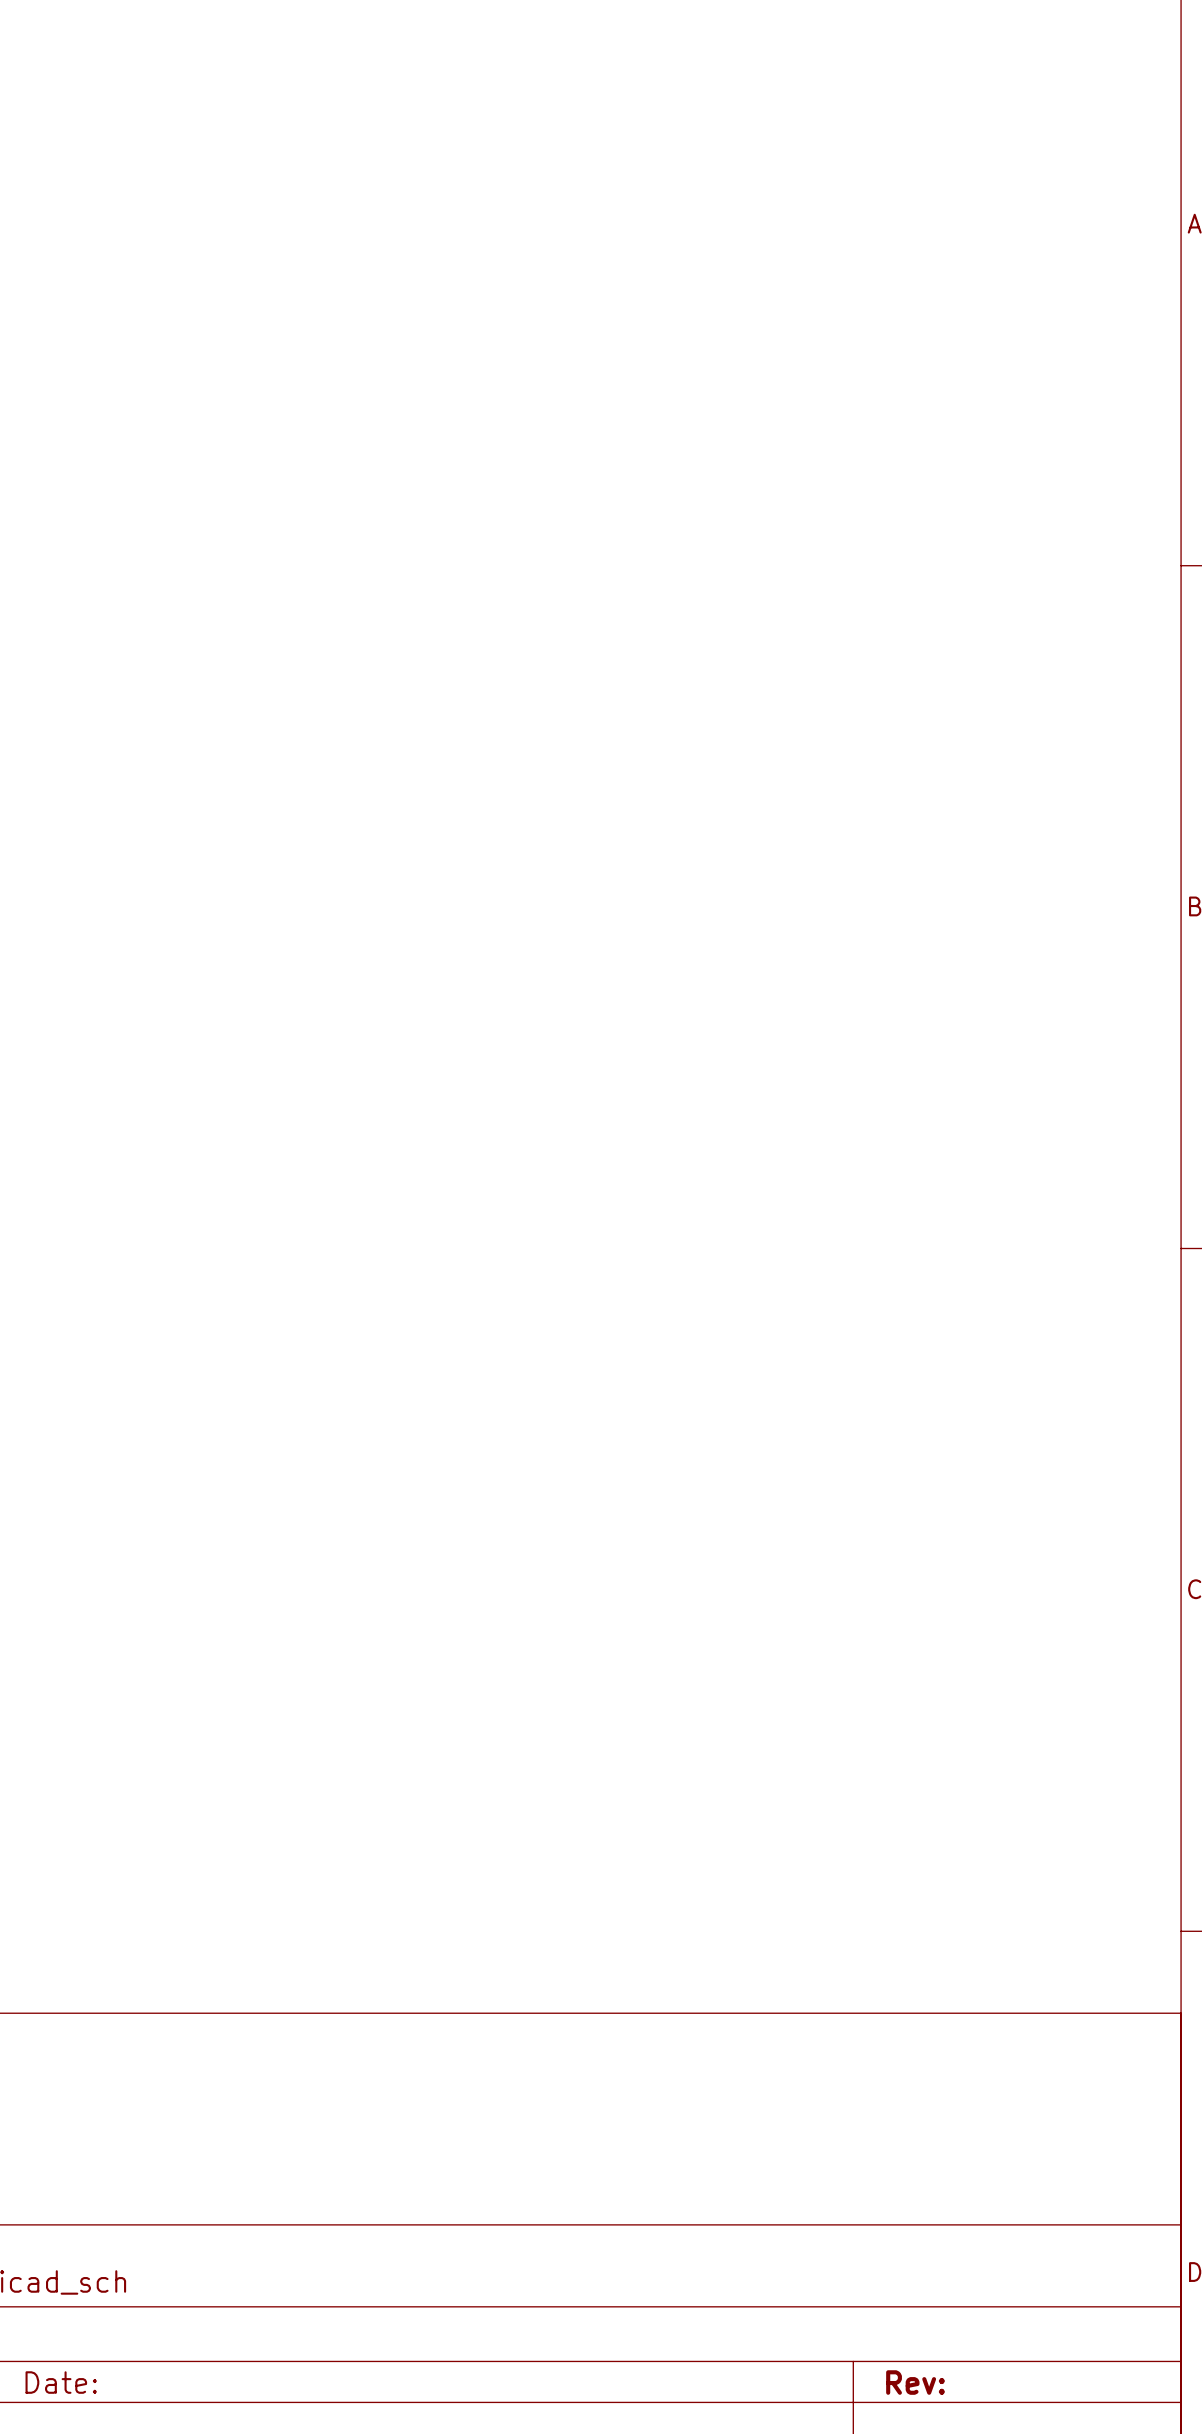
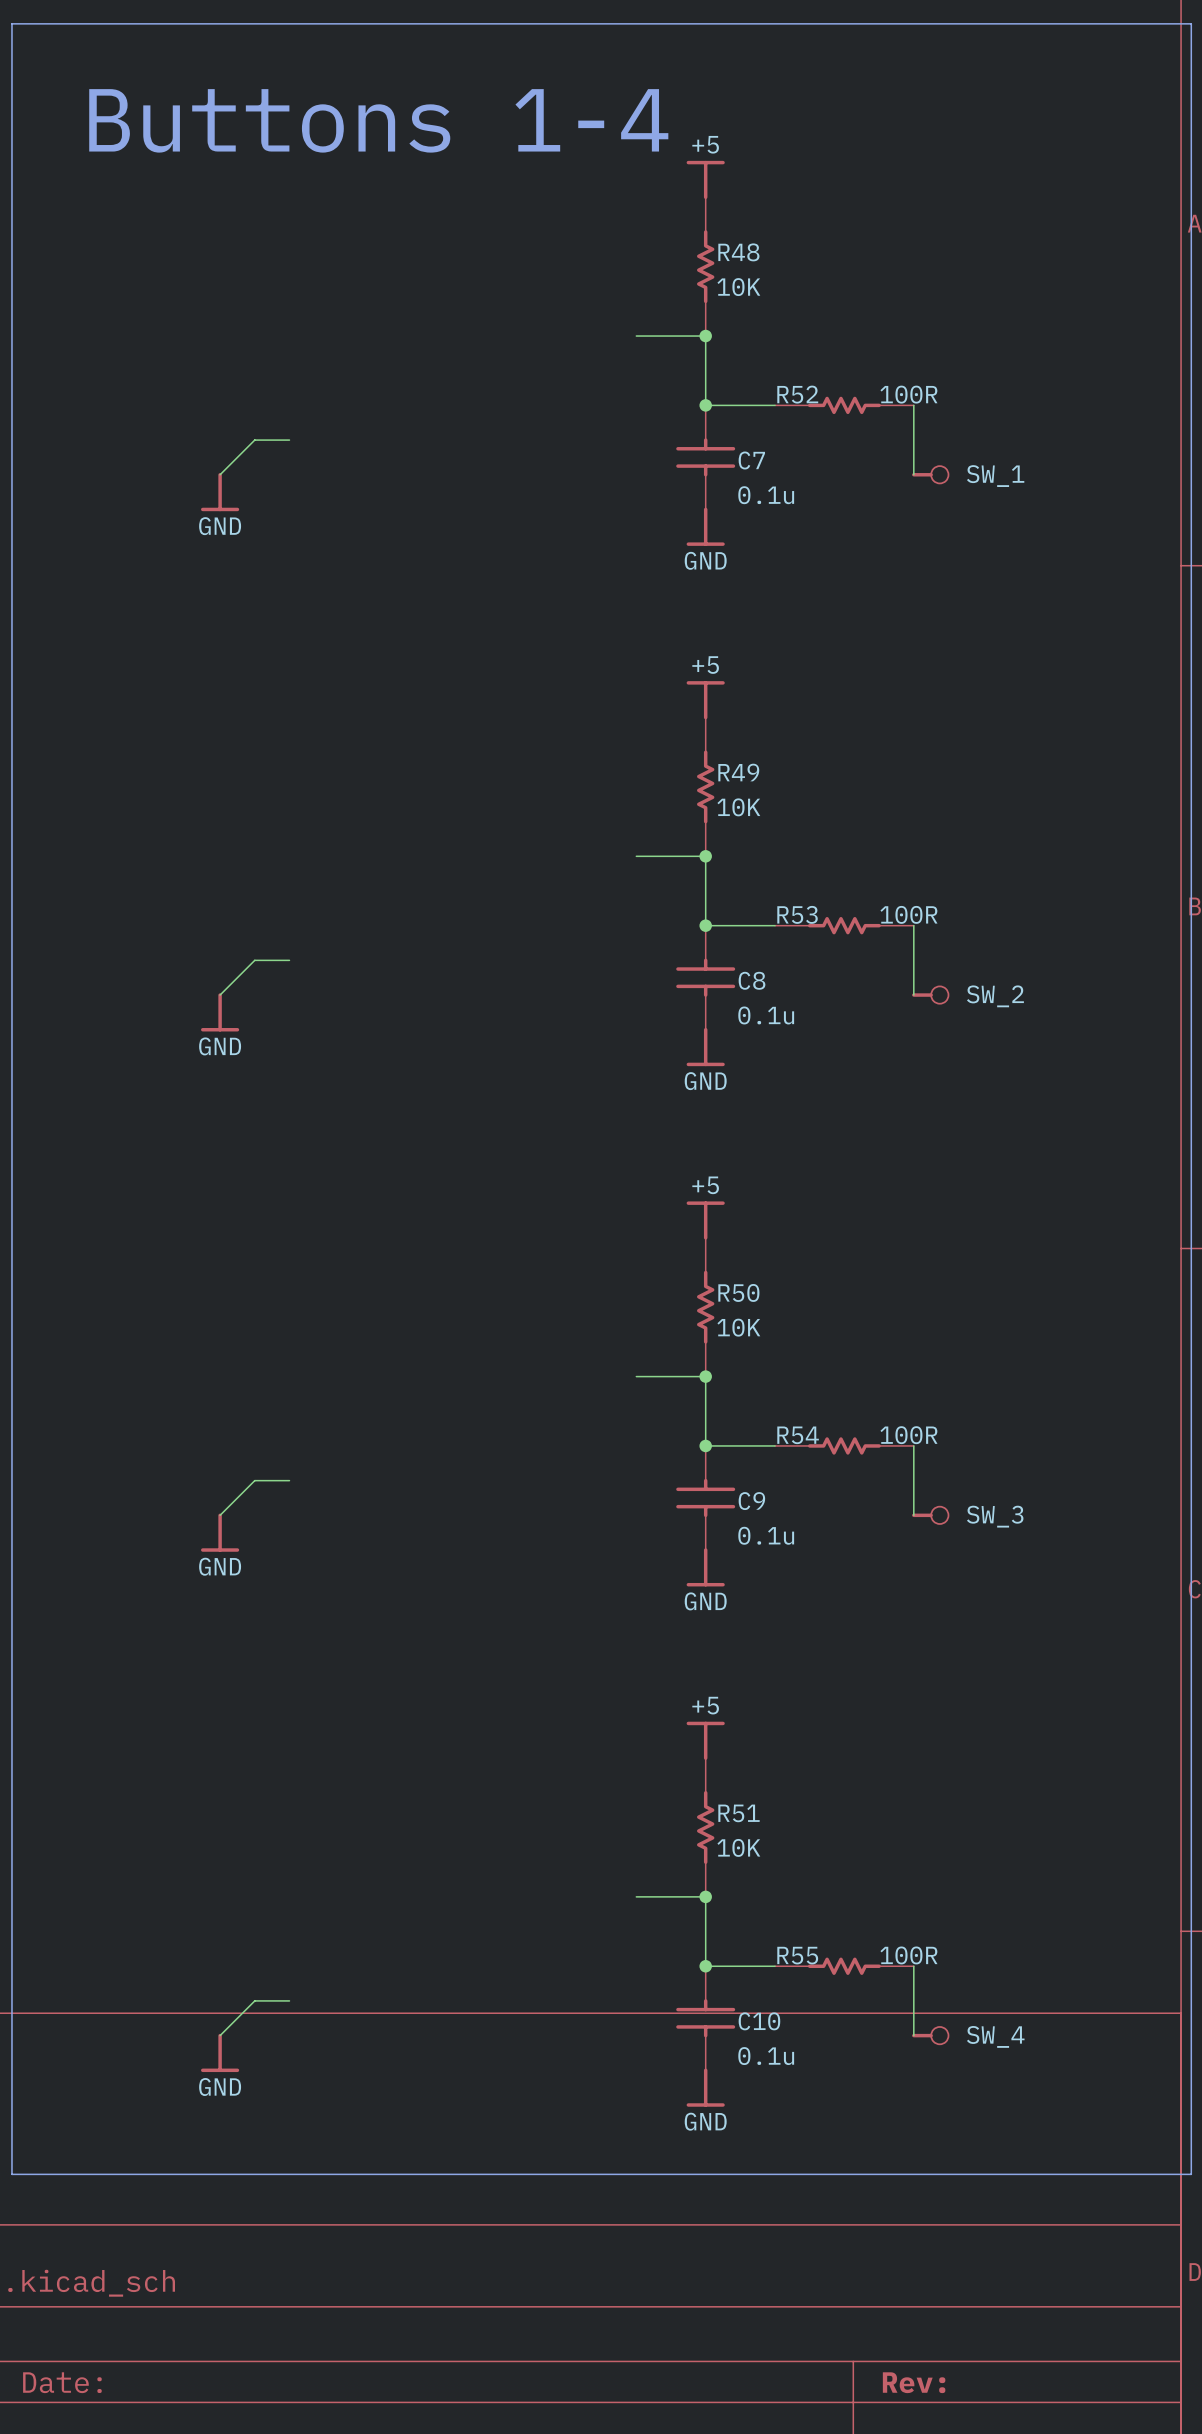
line: none -> (11, 23) (1191, 23) (1191, 2174) (11, 2174) (11, 23)
text: none -> Buttons 1-4 (378, 120)
power symbol: none -> +5 (705, 179)
R48: none -> (705, 266)
wire: none -> (636, 336) (705, 336) (705, 405) (775, 405)
junction: none -> (705, 336)
junction: none -> (705, 405)
R52: none -> (844, 405)
wire: none -> (913, 405) (913, 474)
wire: none -> (289, 440) (254, 440) (220, 474)
C7: none -> 0.1u (705, 457)
power symbol: none -> SW_1 (930, 474)
power symbol: none -> GND (220, 492)
power symbol: none -> GND (705, 526)
power symbol: none -> +5 (705, 700)
R49: none -> (705, 786)
wire: none -> (636, 856) (705, 856) (705, 925) (775, 925)
junction: none -> (705, 856)
junction: none -> (705, 925)
R53: none -> (844, 925)
wire: none -> (913, 925) (913, 995)
wire: none -> (289, 960) (254, 960) (220, 995)
C8: none -> 0.1u (705, 977)
power symbol: none -> SW_2 (930, 995)
power symbol: none -> GND (220, 1012)
power symbol: none -> GND (705, 1047)
power symbol: none -> +5 (705, 1220)
R50: none -> (705, 1307)
wire: none -> (636, 1376) (705, 1376) (705, 1445) (775, 1445)
junction: none -> (705, 1376)
junction: none -> (705, 1445)
R54: none -> (844, 1445)
wire: none -> (913, 1445) (913, 1515)
wire: none -> (289, 1480) (254, 1480) (220, 1515)
C9: none -> 0.1u (705, 1497)
power symbol: none -> SW_3 (930, 1515)
power symbol: none -> GND (220, 1532)
power symbol: none -> GND (705, 1567)
power symbol: none -> +5 (705, 1740)
R51: none -> (705, 1827)
wire: none -> (636, 1896) (705, 1896) (705, 1966) (775, 1966)
junction: none -> (705, 1896)
junction: none -> (705, 1966)
R55: none -> (844, 1966)
wire: none -> (913, 1966) (913, 2035)
wire: none -> (289, 2000) (254, 2000) (220, 2035)
C10: none -> 0.1u (705, 2018)
power symbol: none -> SW_4 (930, 2035)
power symbol: none -> GND (220, 2052)
power symbol: none -> GND (705, 2087)

